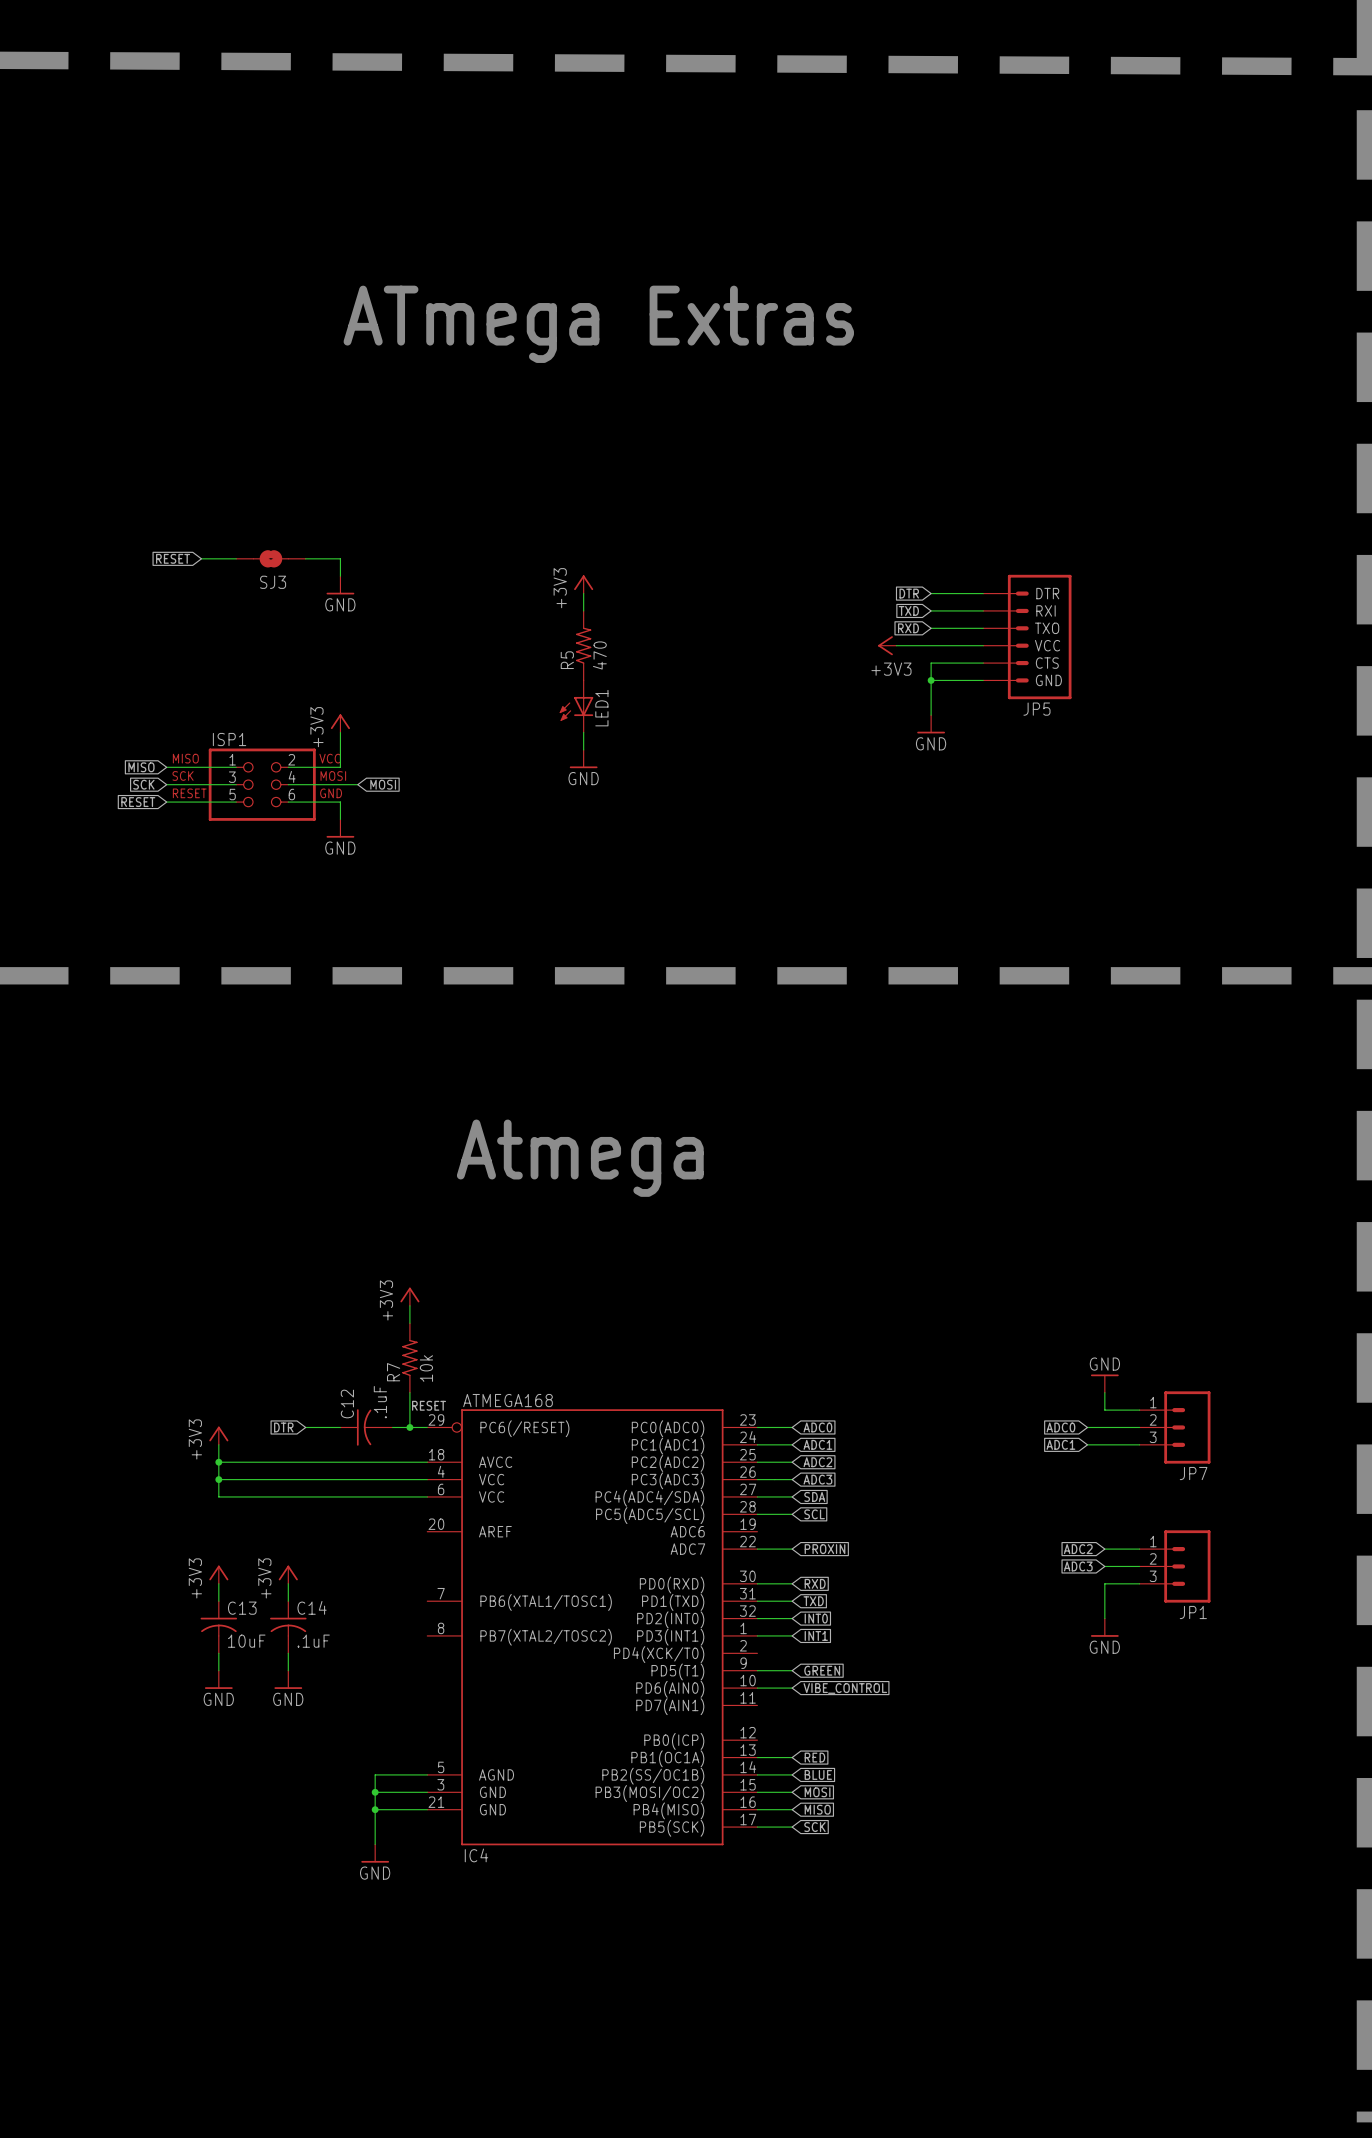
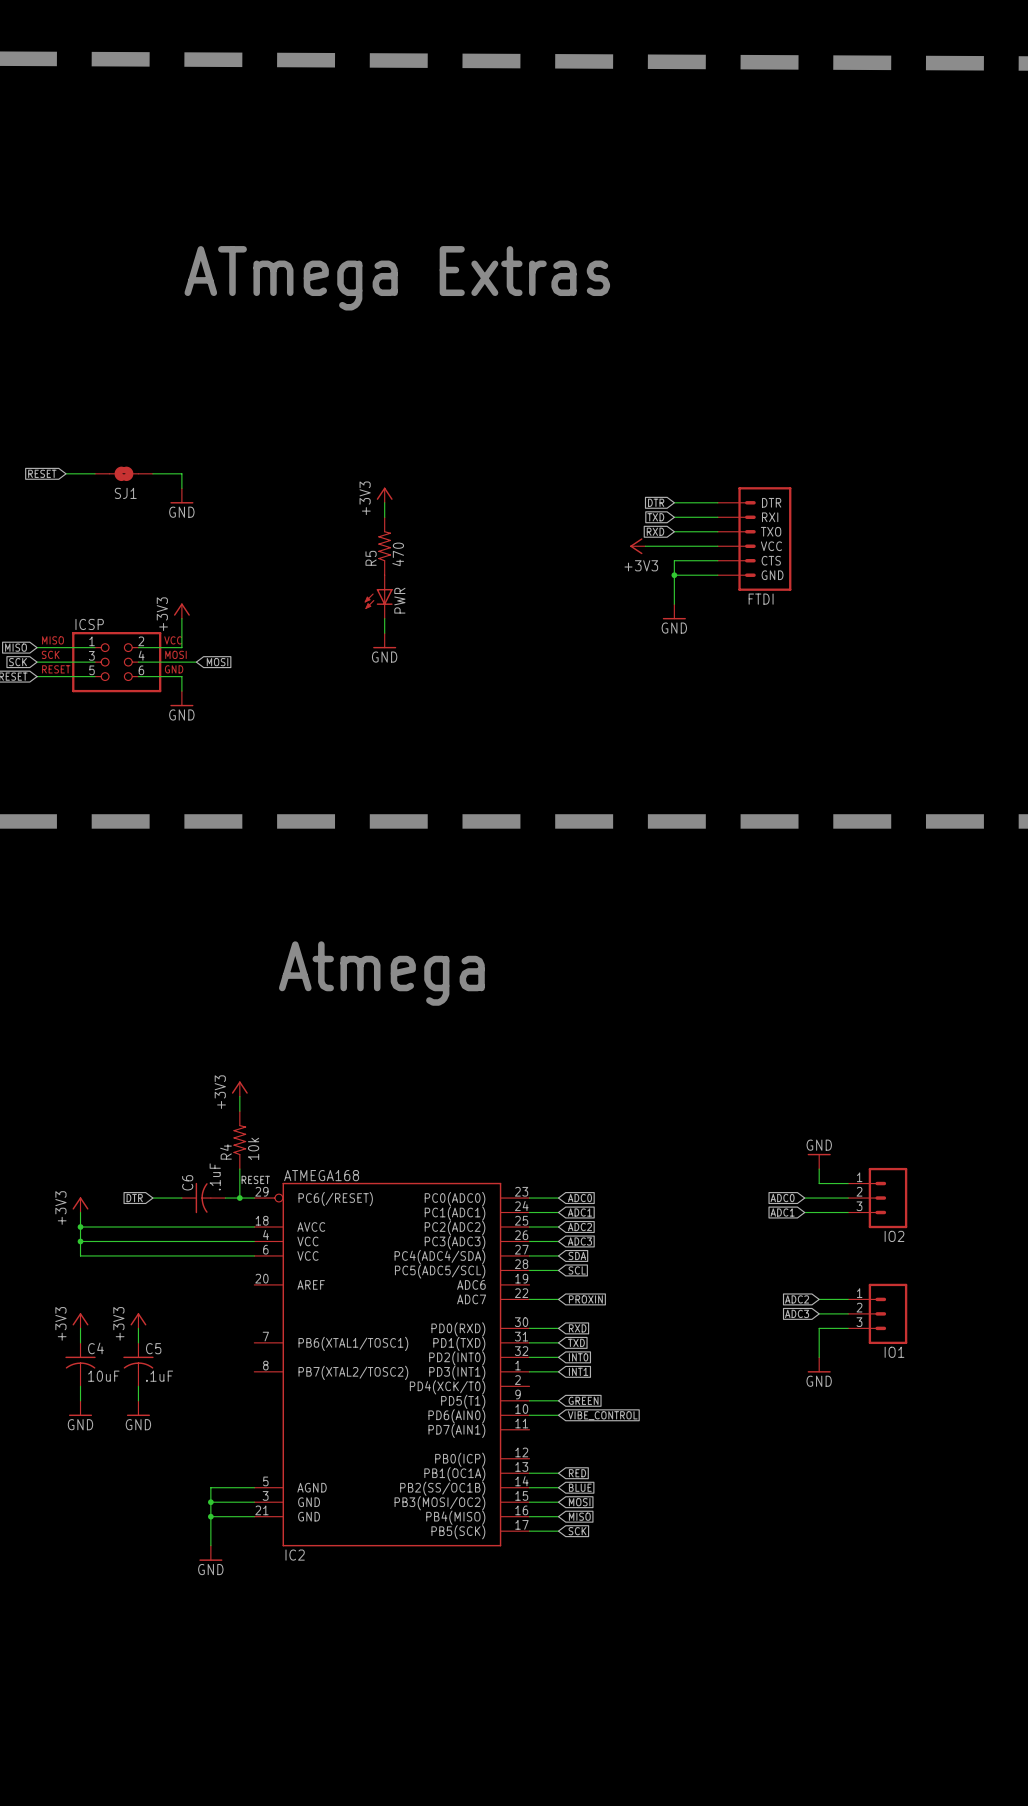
SJ3 name: SJ3 (273, 582) -> SJ1 (125, 493)
LED1 name: LED1 (601, 708) -> PWR (399, 600)
JP5 name: JP5 (1036, 709) -> FTDI (761, 599)
ISP1 name: ISP1 (229, 739) -> ICSP (89, 624)
R7 name: R7 (393, 1372) -> R4 (225, 1151)
C12 name: C12 (347, 1403) -> C6 (187, 1182)
JP7 name: JP7 (1193, 1473) -> IO2 (894, 1236)
C14 name: C14 (312, 1607) -> C5 (153, 1348)
C13 name: C13 (242, 1608) -> C4 (95, 1348)
JP1 name: JP1 (1193, 1612) -> IO1 (894, 1352)
IC4 name: IC4 (476, 1855) -> IC2 (295, 1555)

